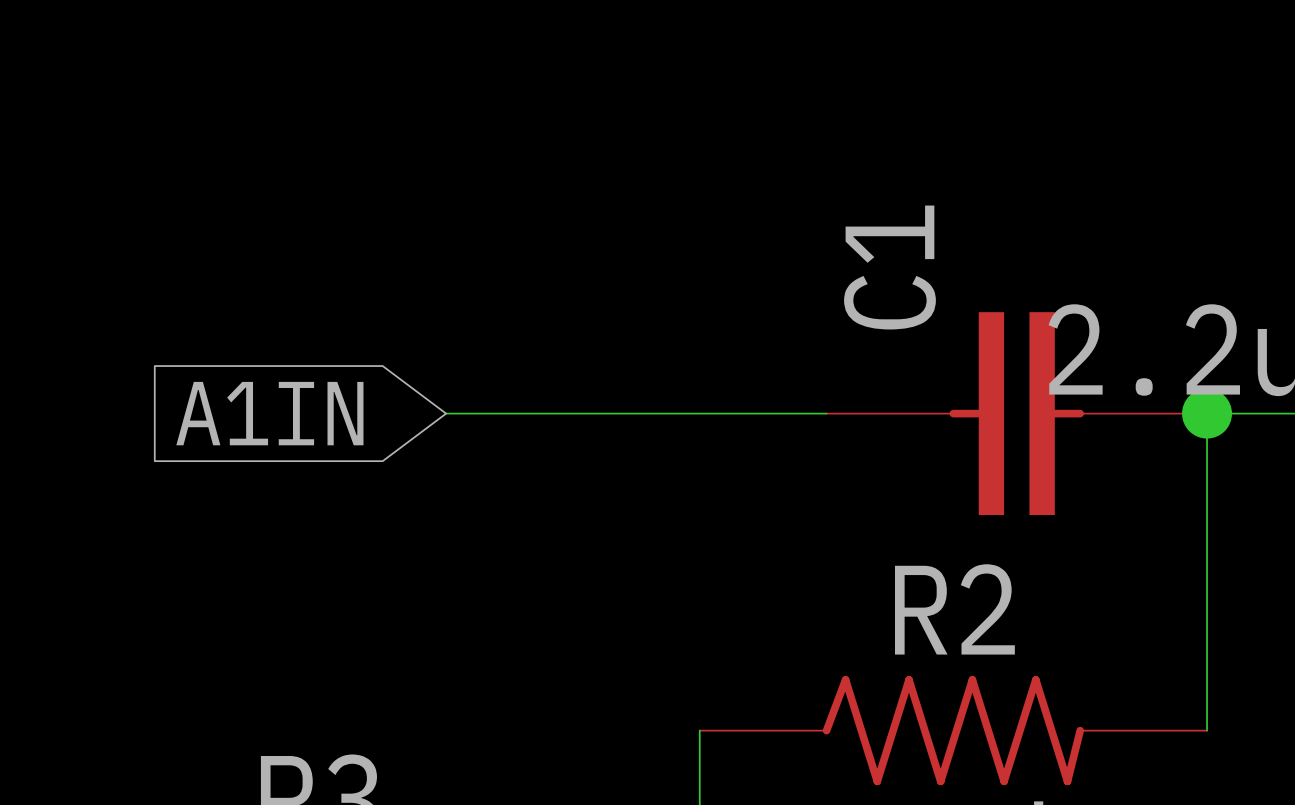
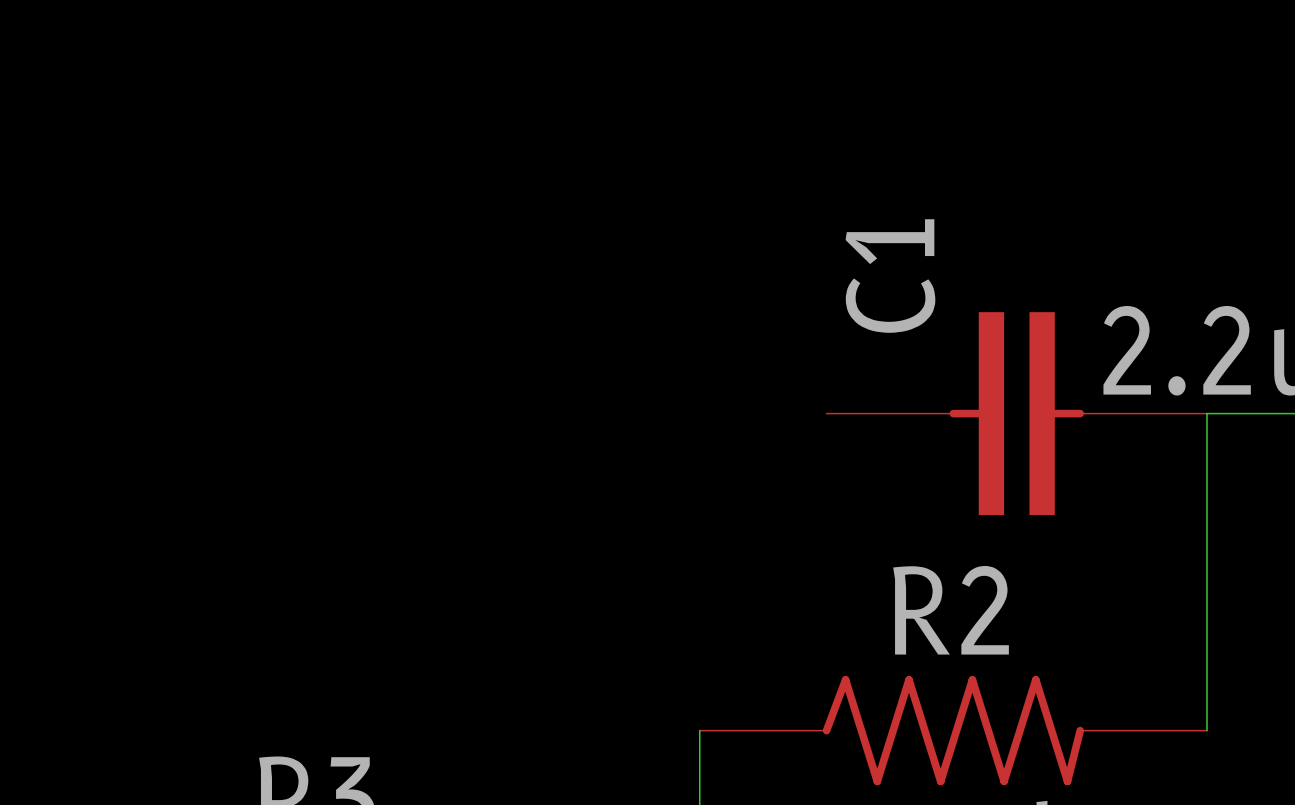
global label: A1IN (269, 413) -> none
wire: (446, 413) (826, 413) -> none
junction: (1207, 413) -> none

